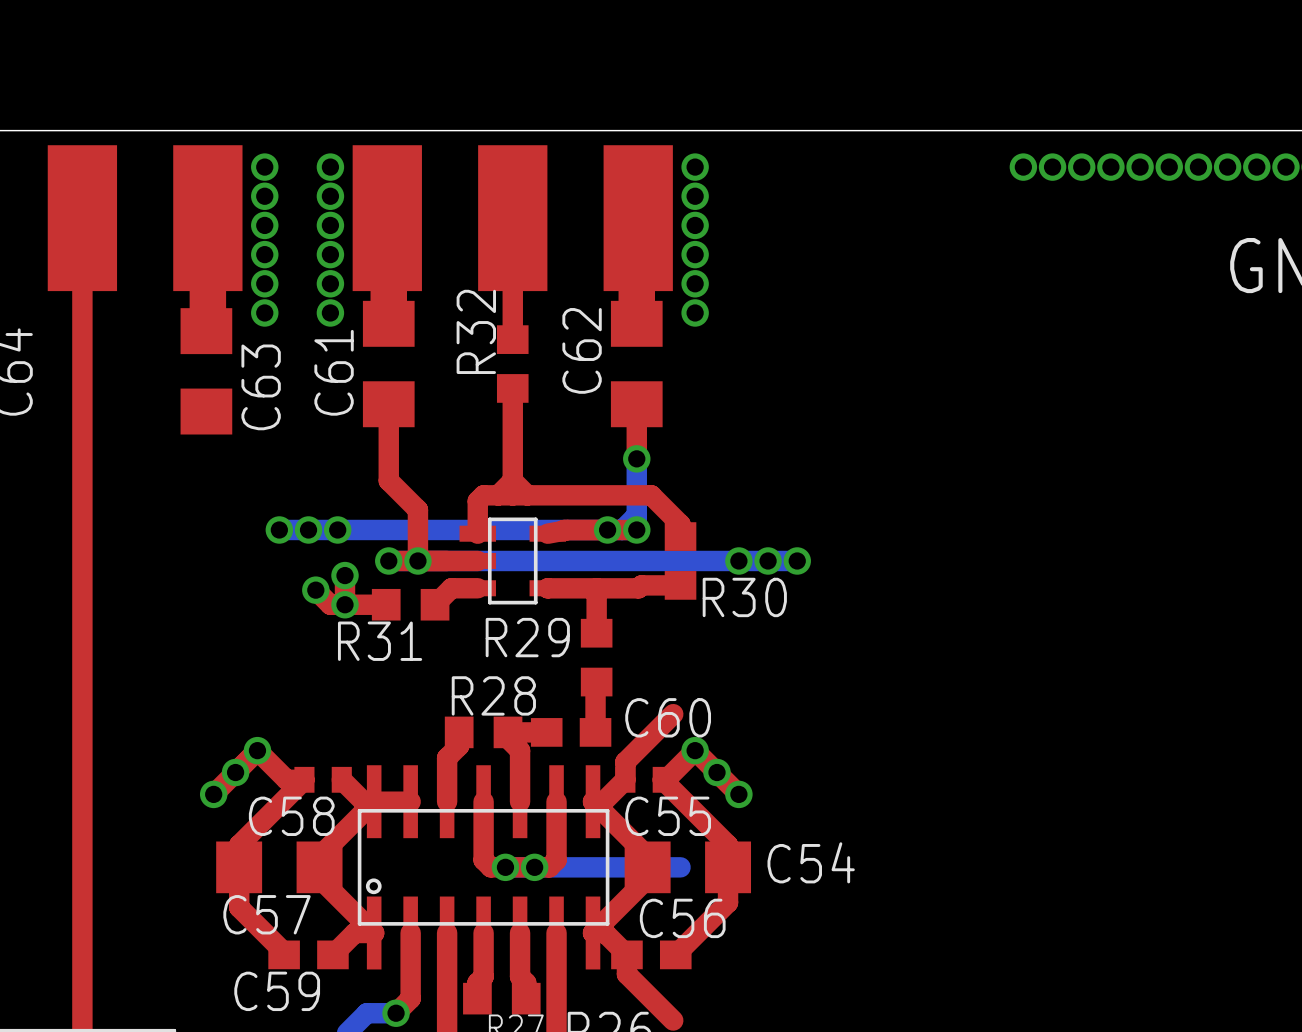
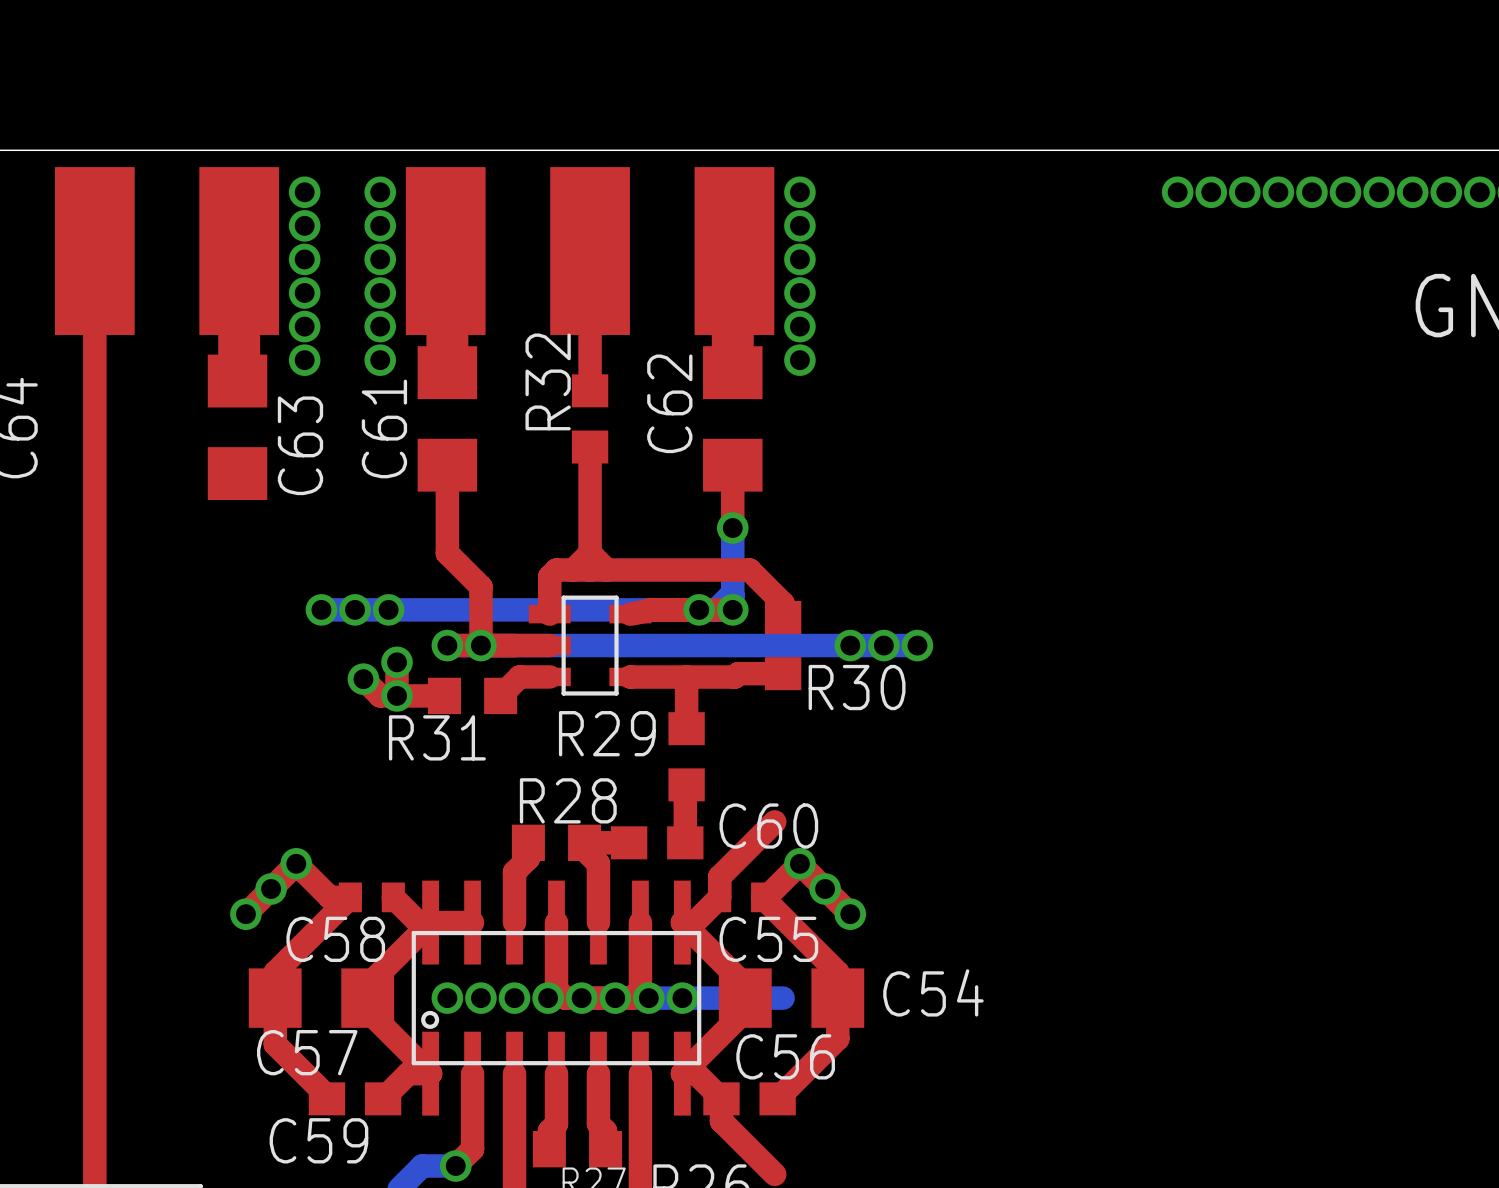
via: none -> (447, 998)
via: none -> (480, 998)
via: none -> (514, 998)
via: none -> (548, 998)
via: none -> (648, 998)
via: none -> (682, 998)

